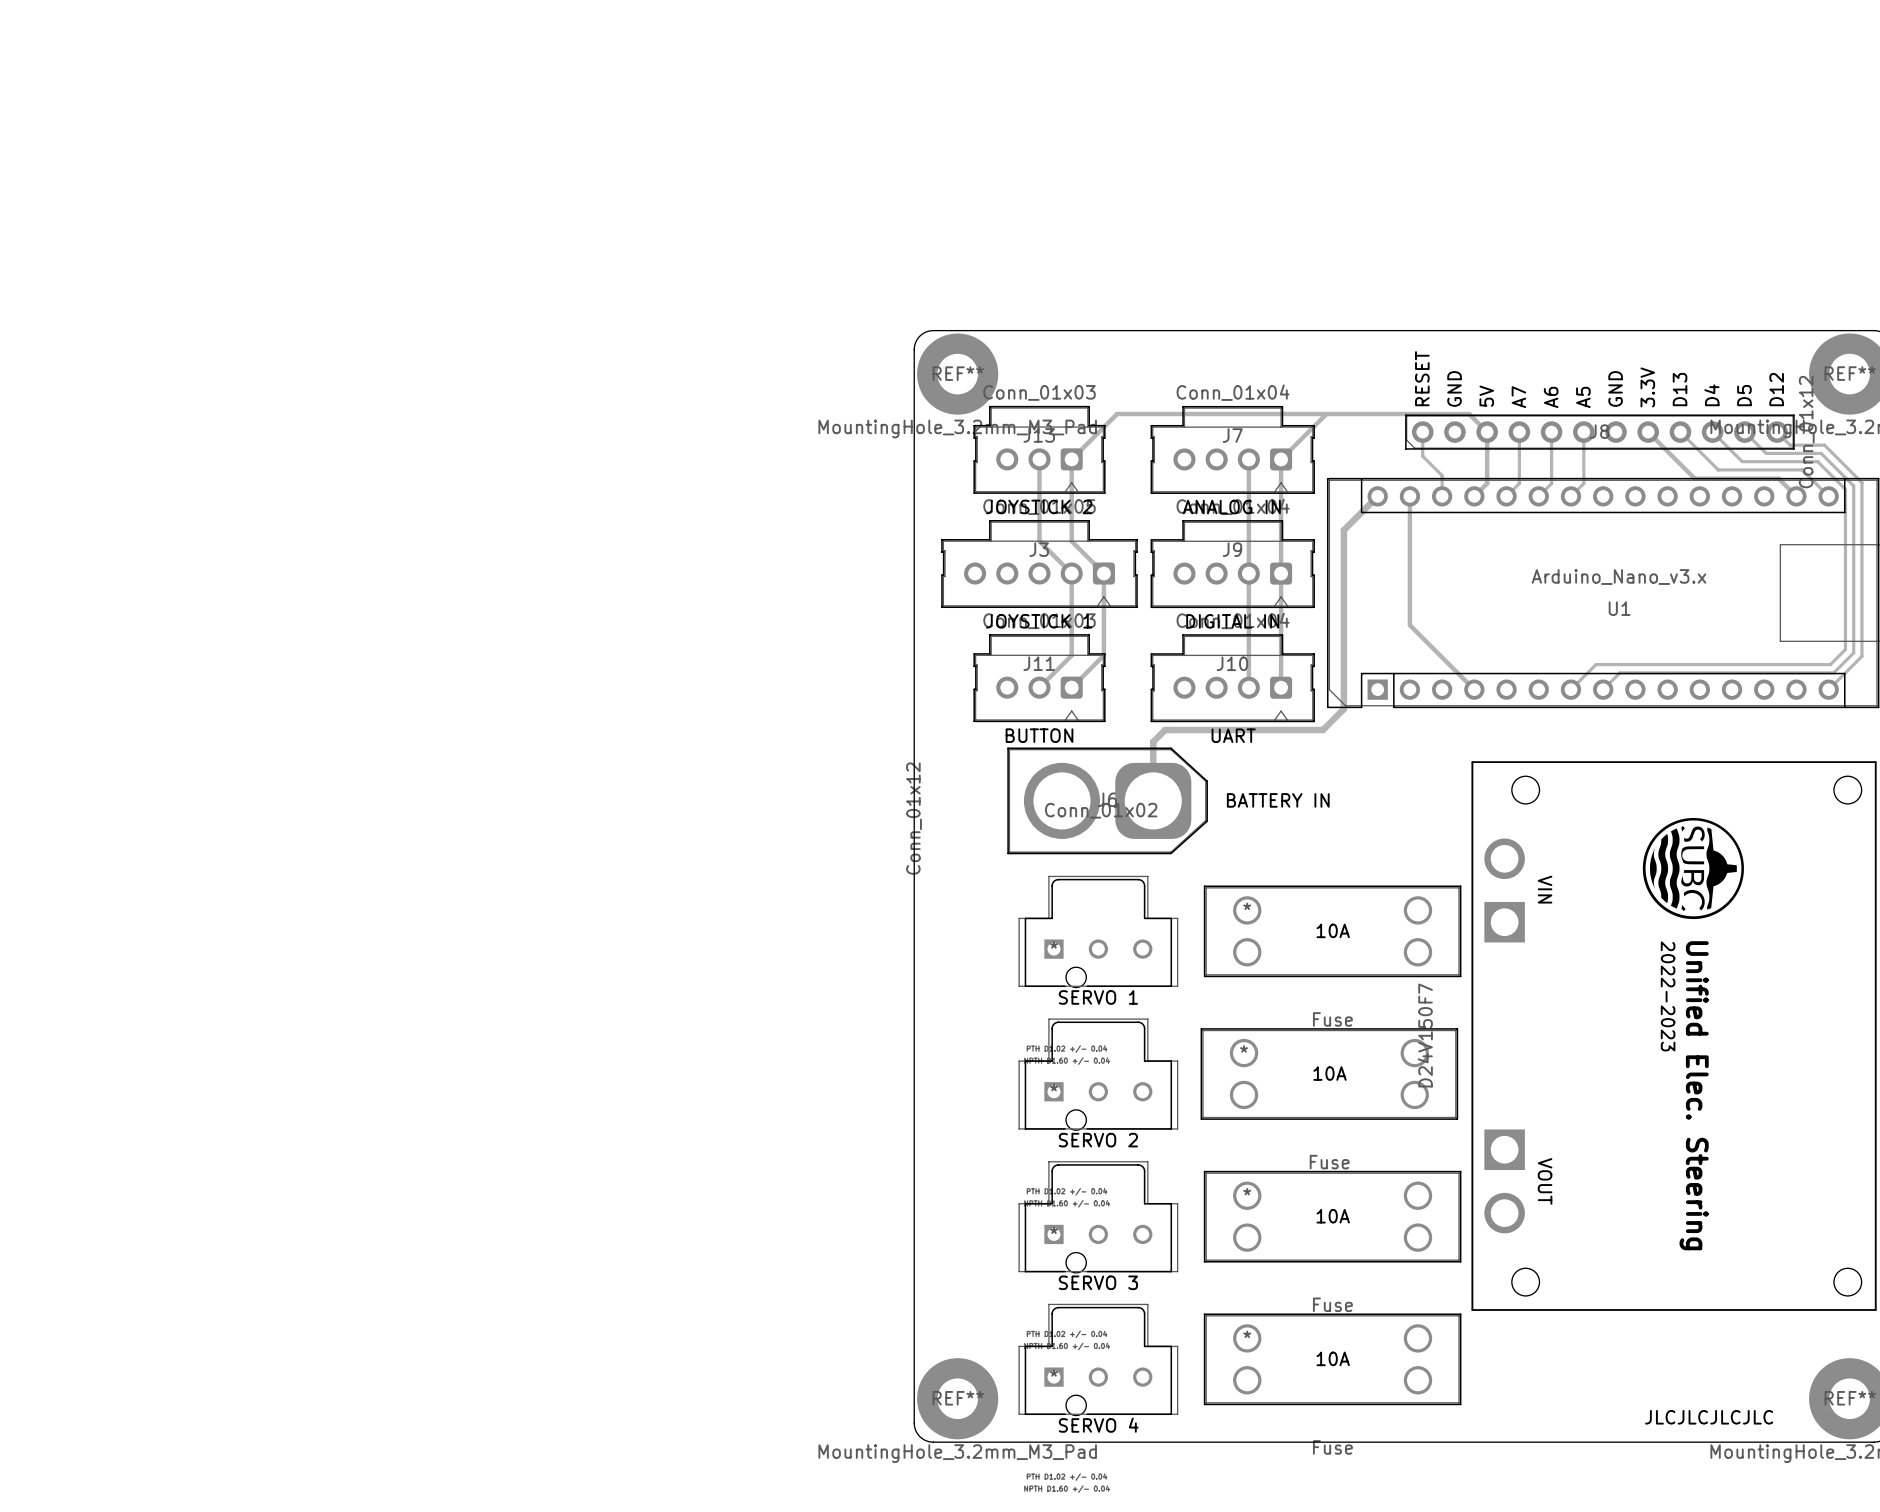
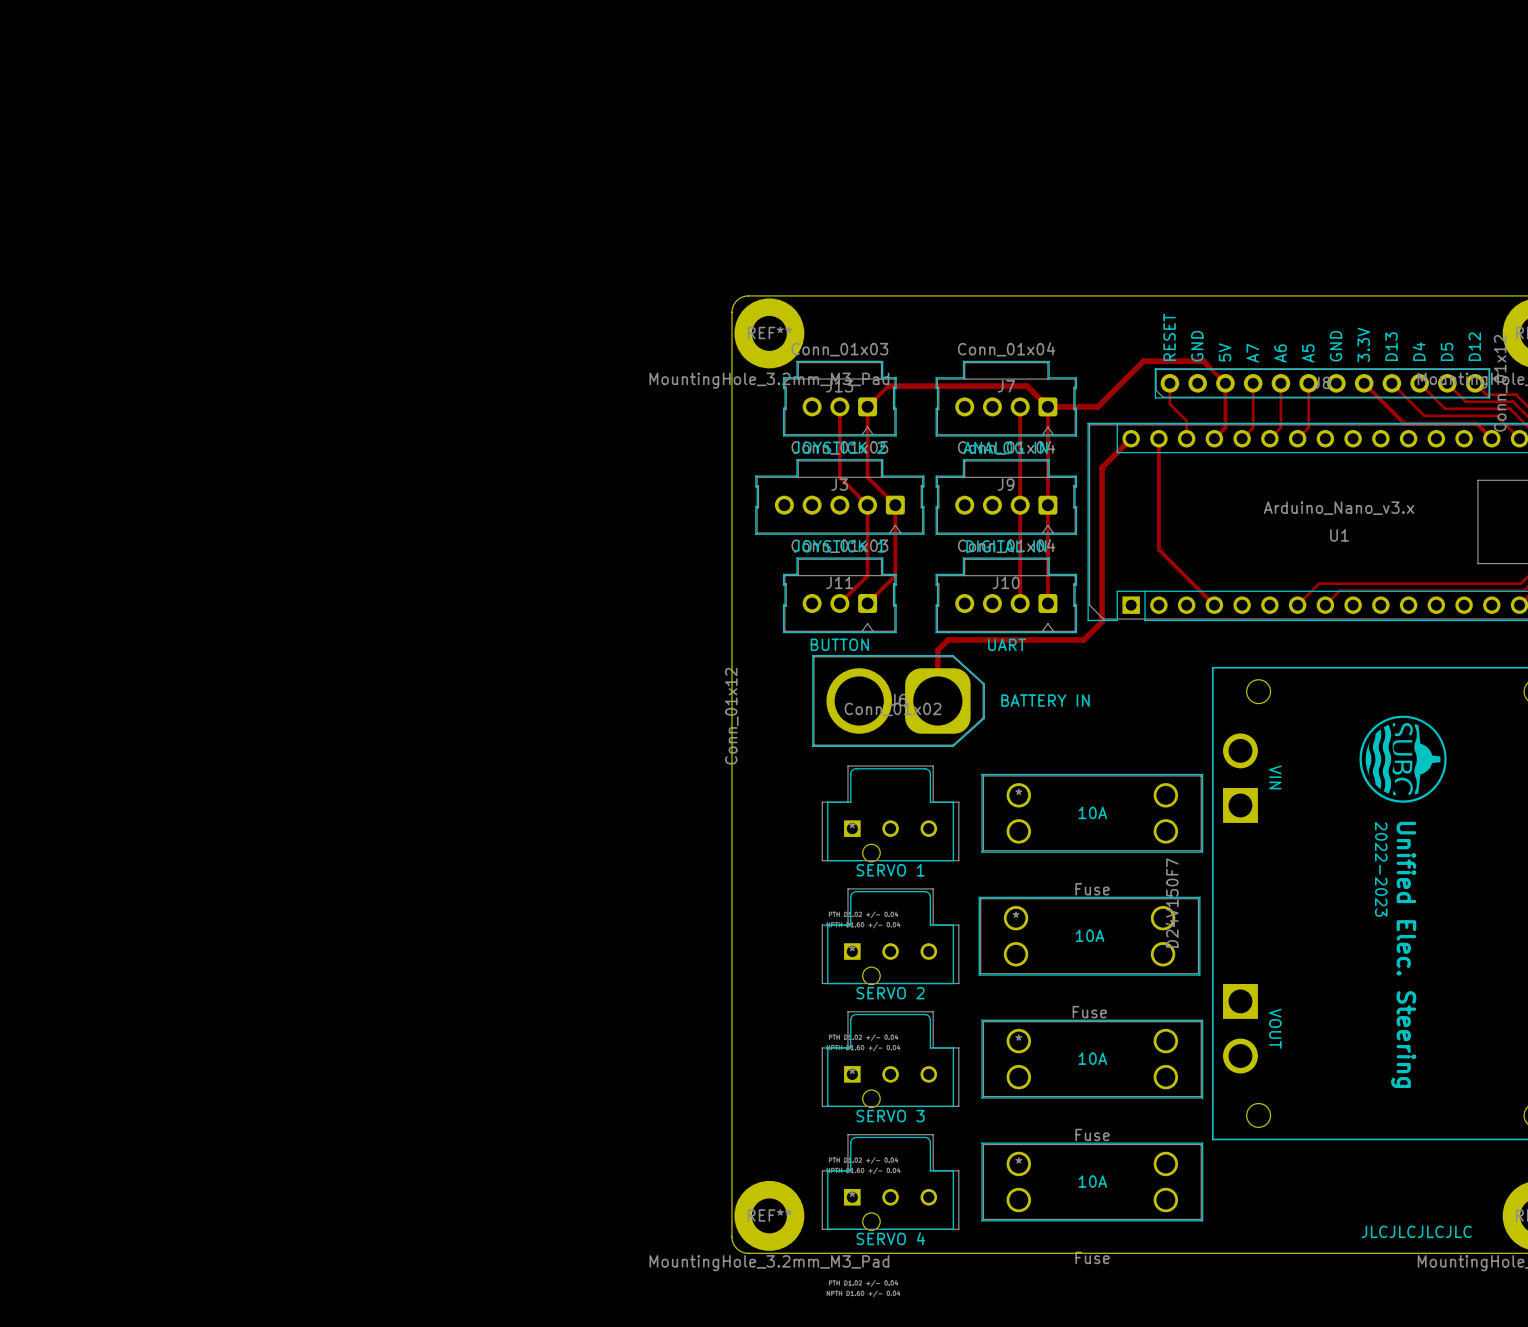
track: (1326, 414) (1281, 459) -> none
track: (1469, 414) (1117, 414) (1095, 435) -> (1209, 367) (1203, 361) (1143, 361) (1097, 406) (1047, 406) (1027, 386) (888, 386)

